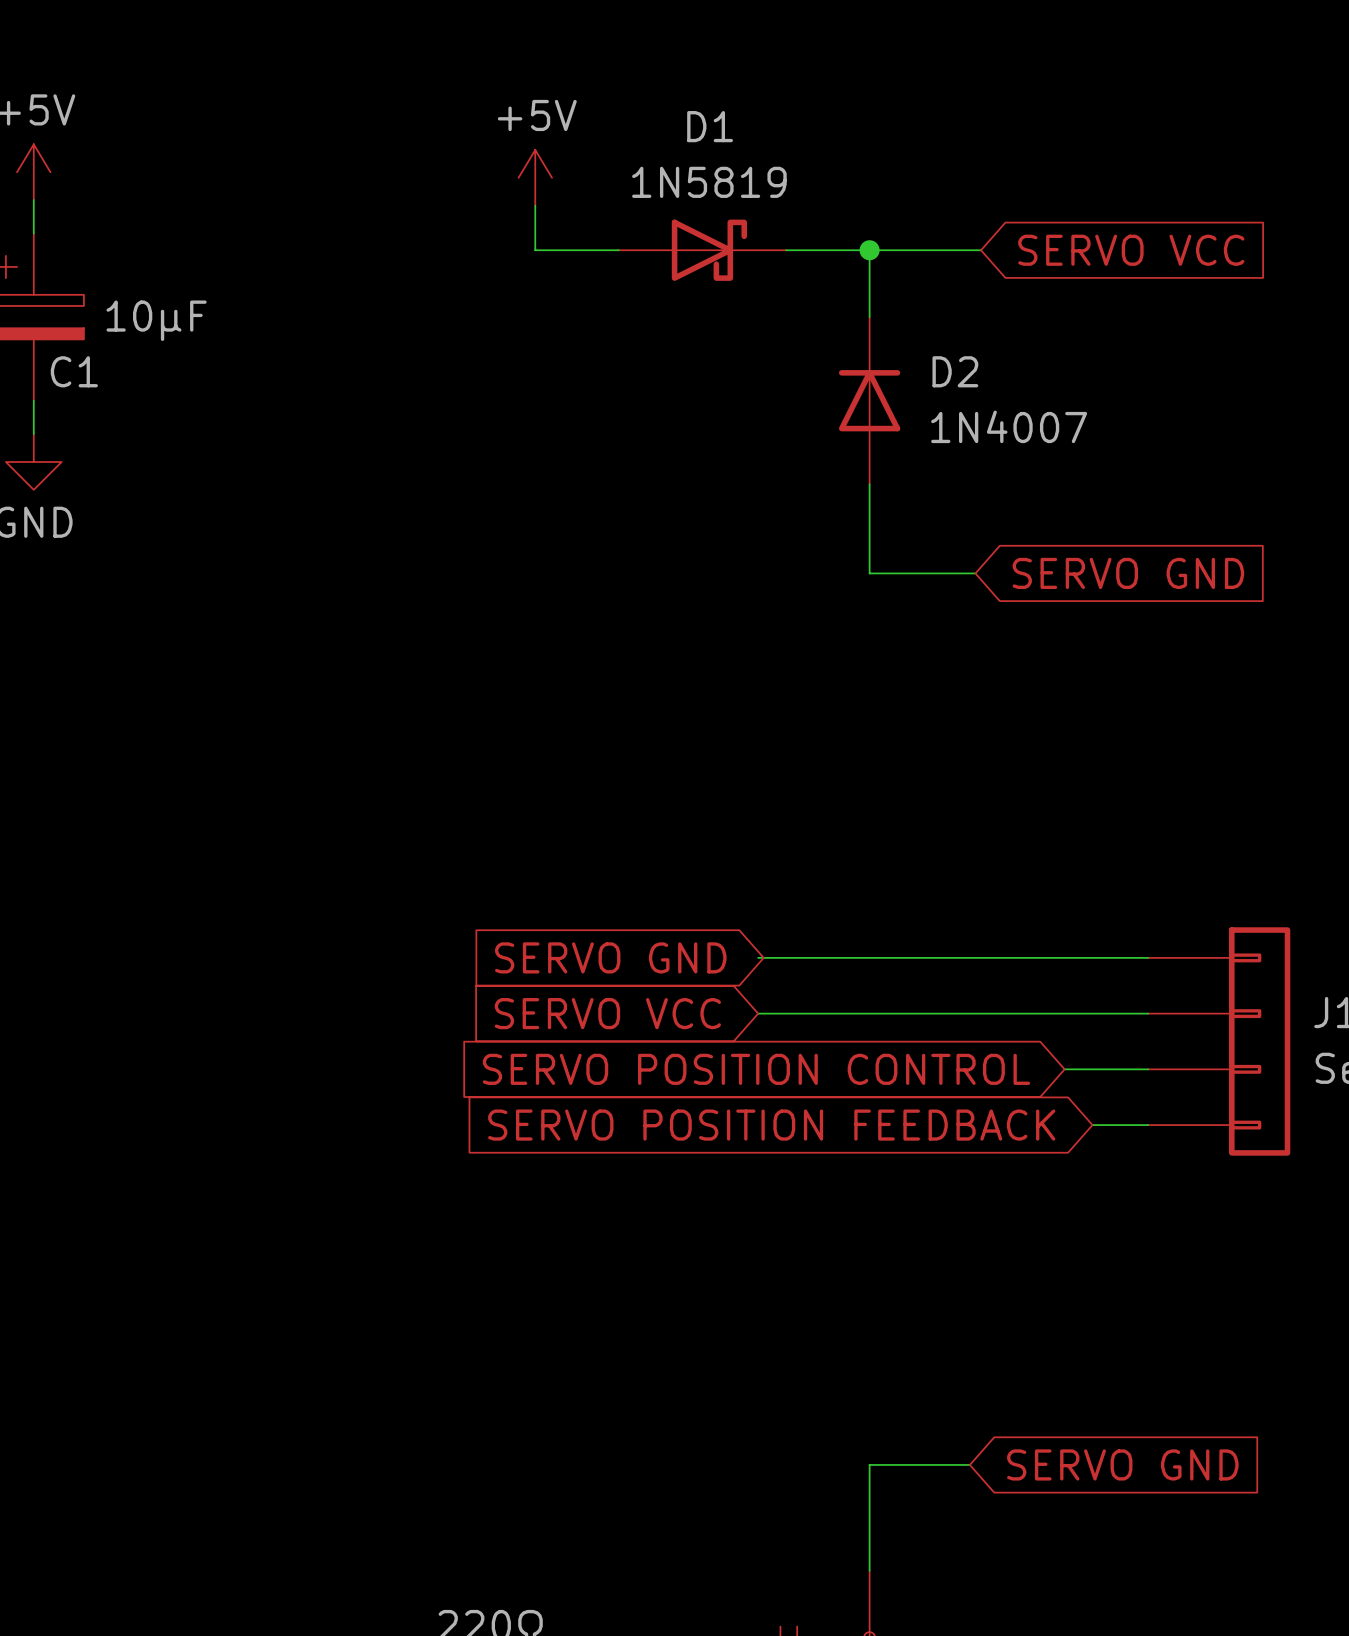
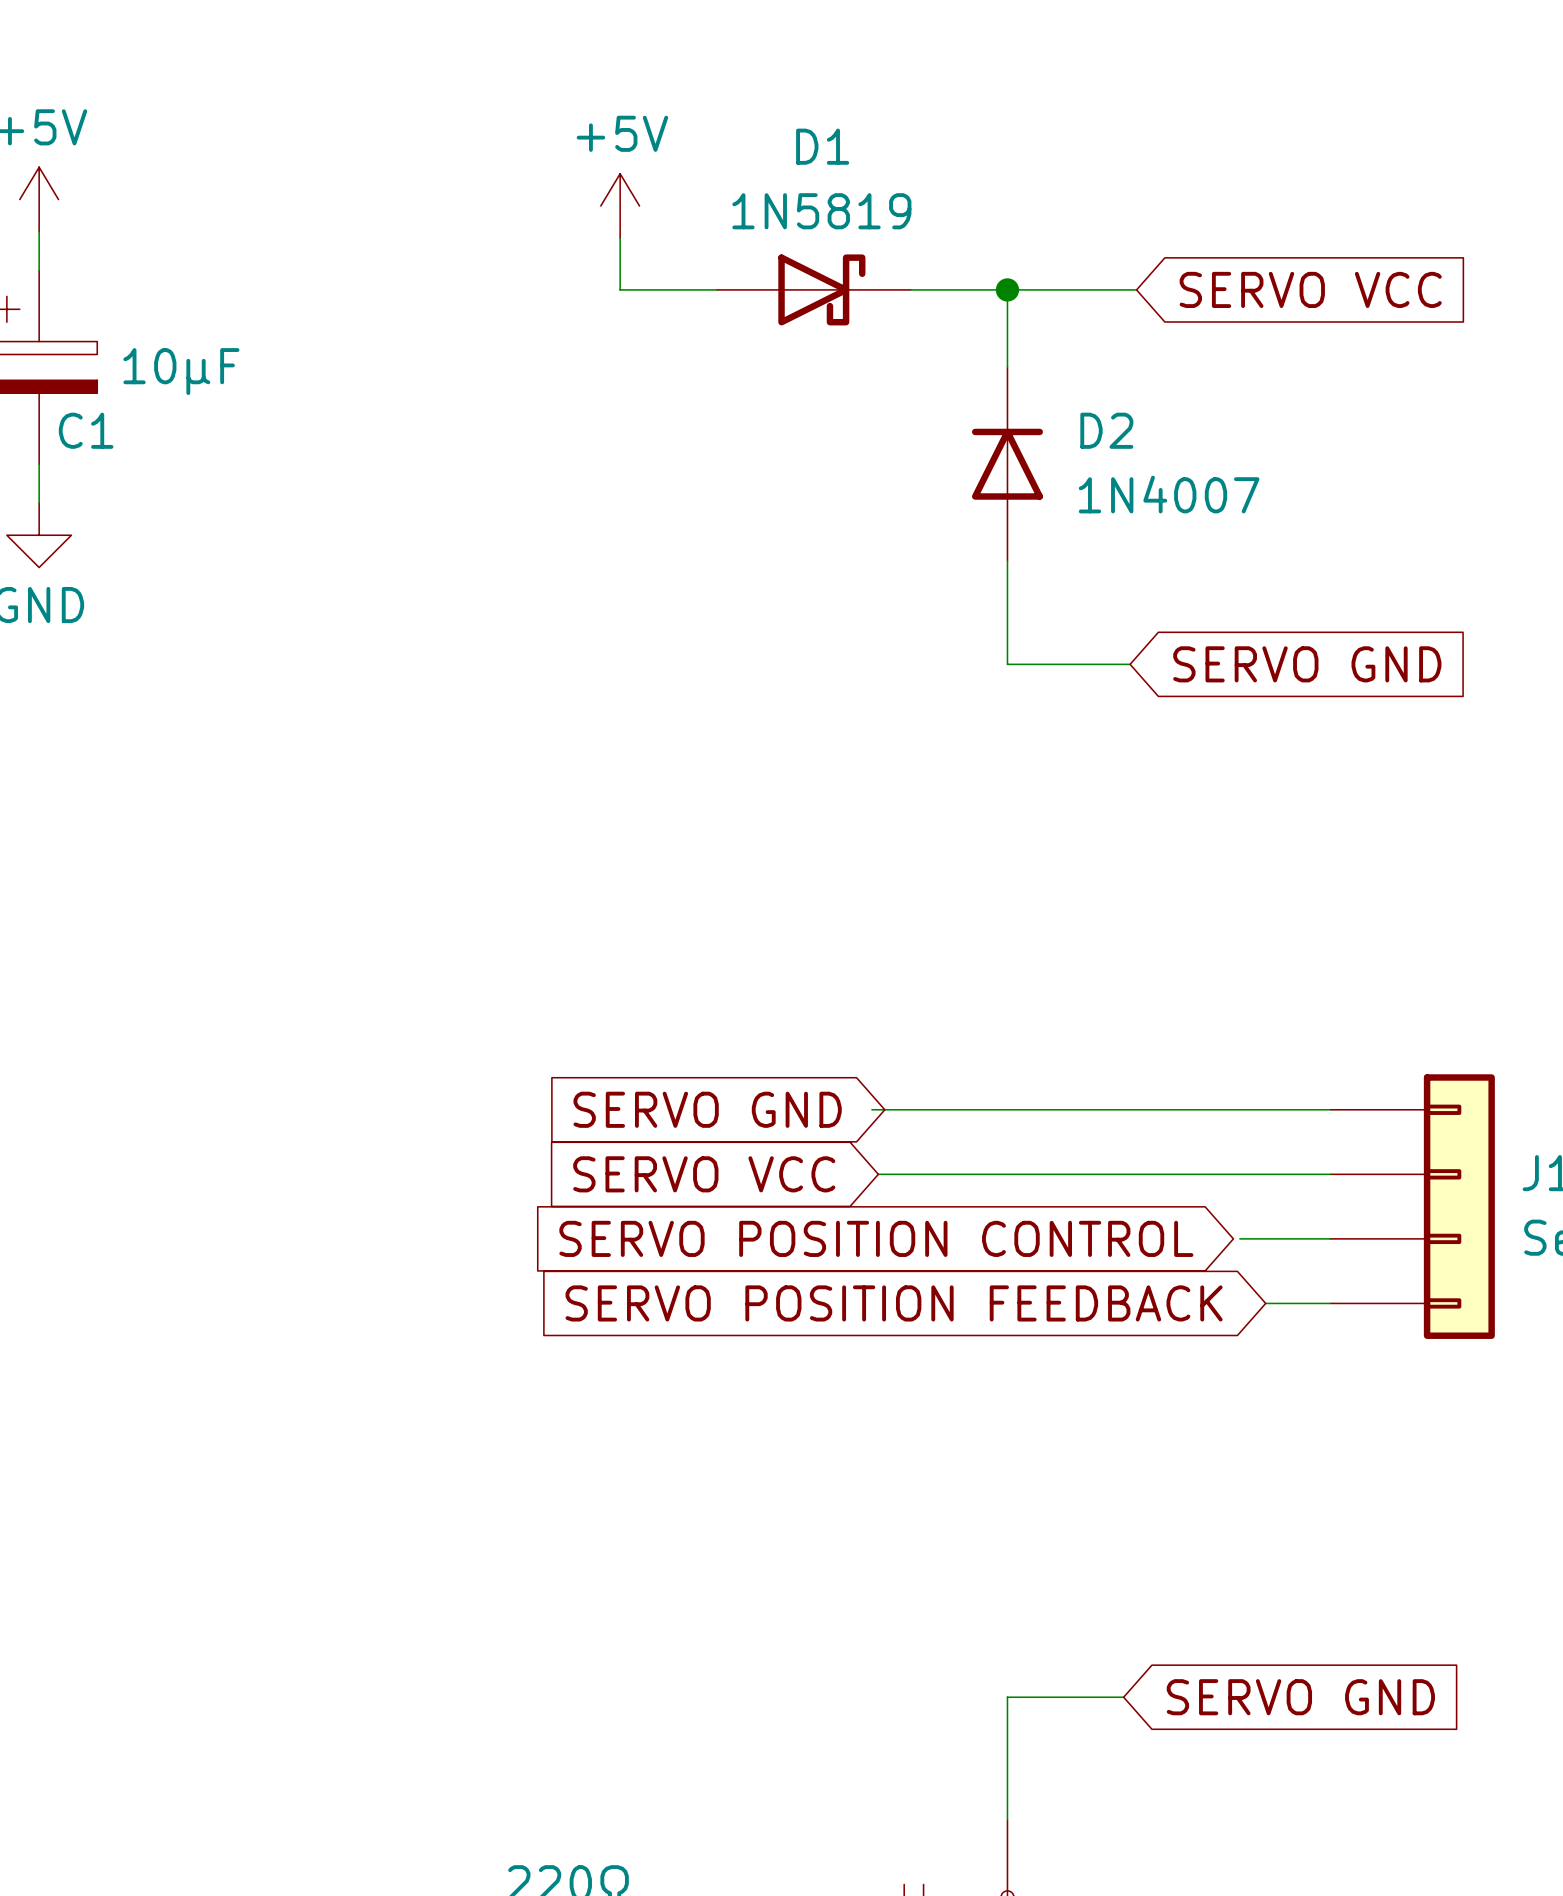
wire: (1064, 1069) (1070, 1069) -> (871, 1109) (878, 1109)

